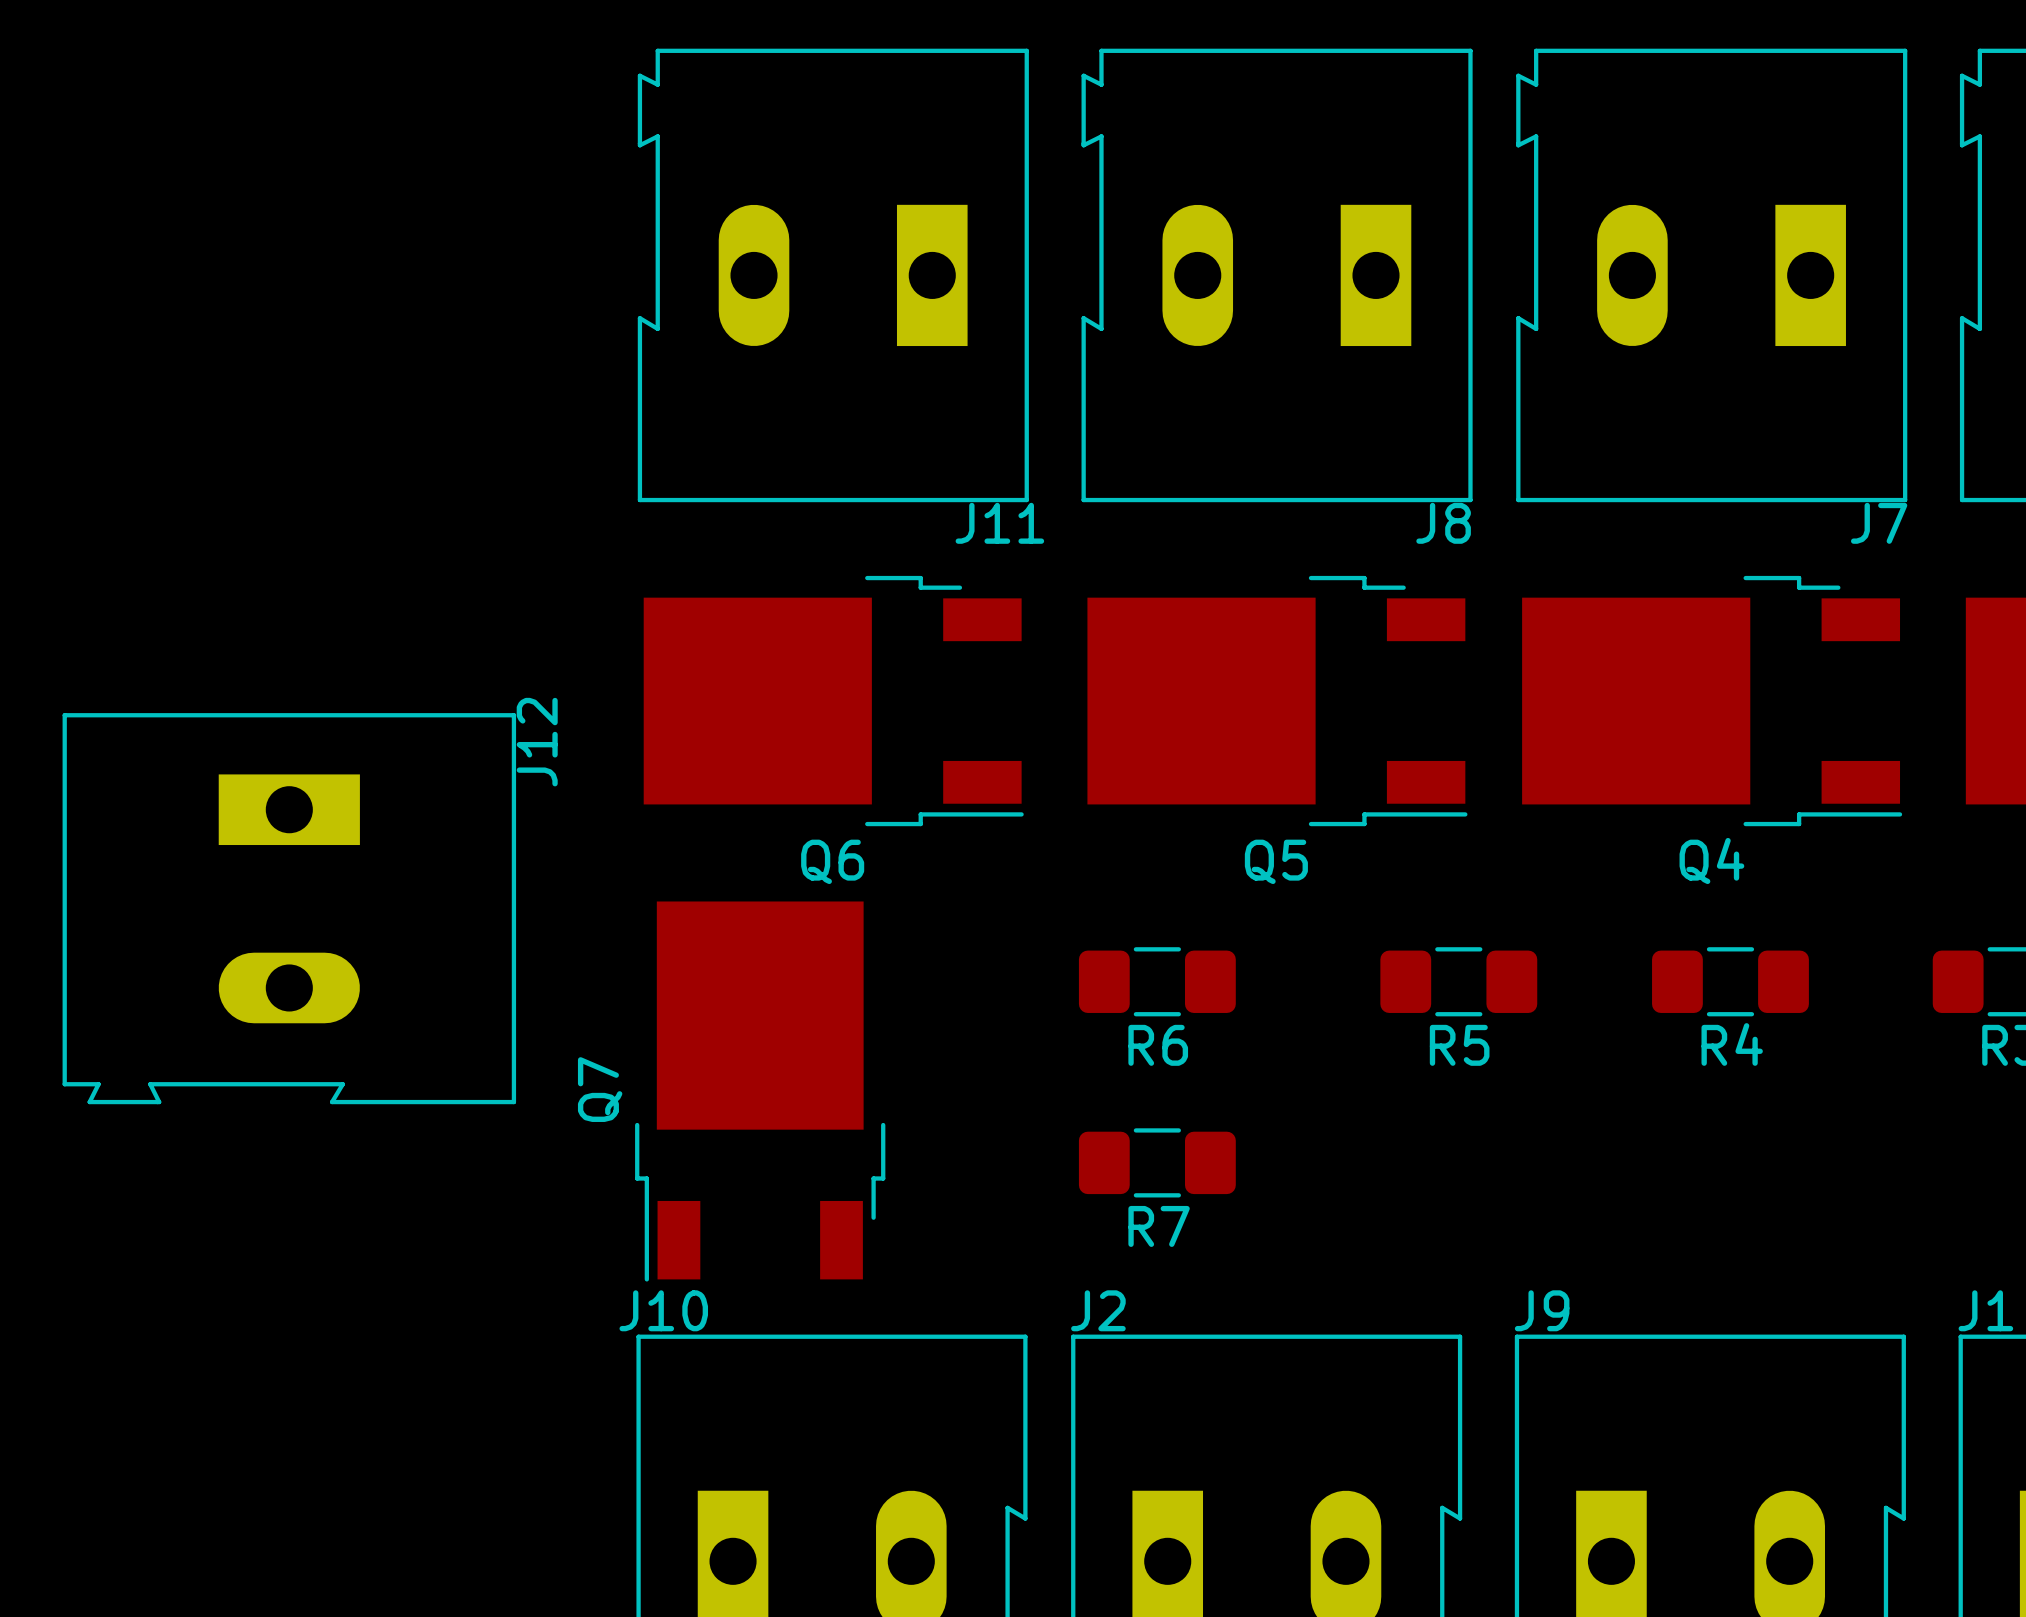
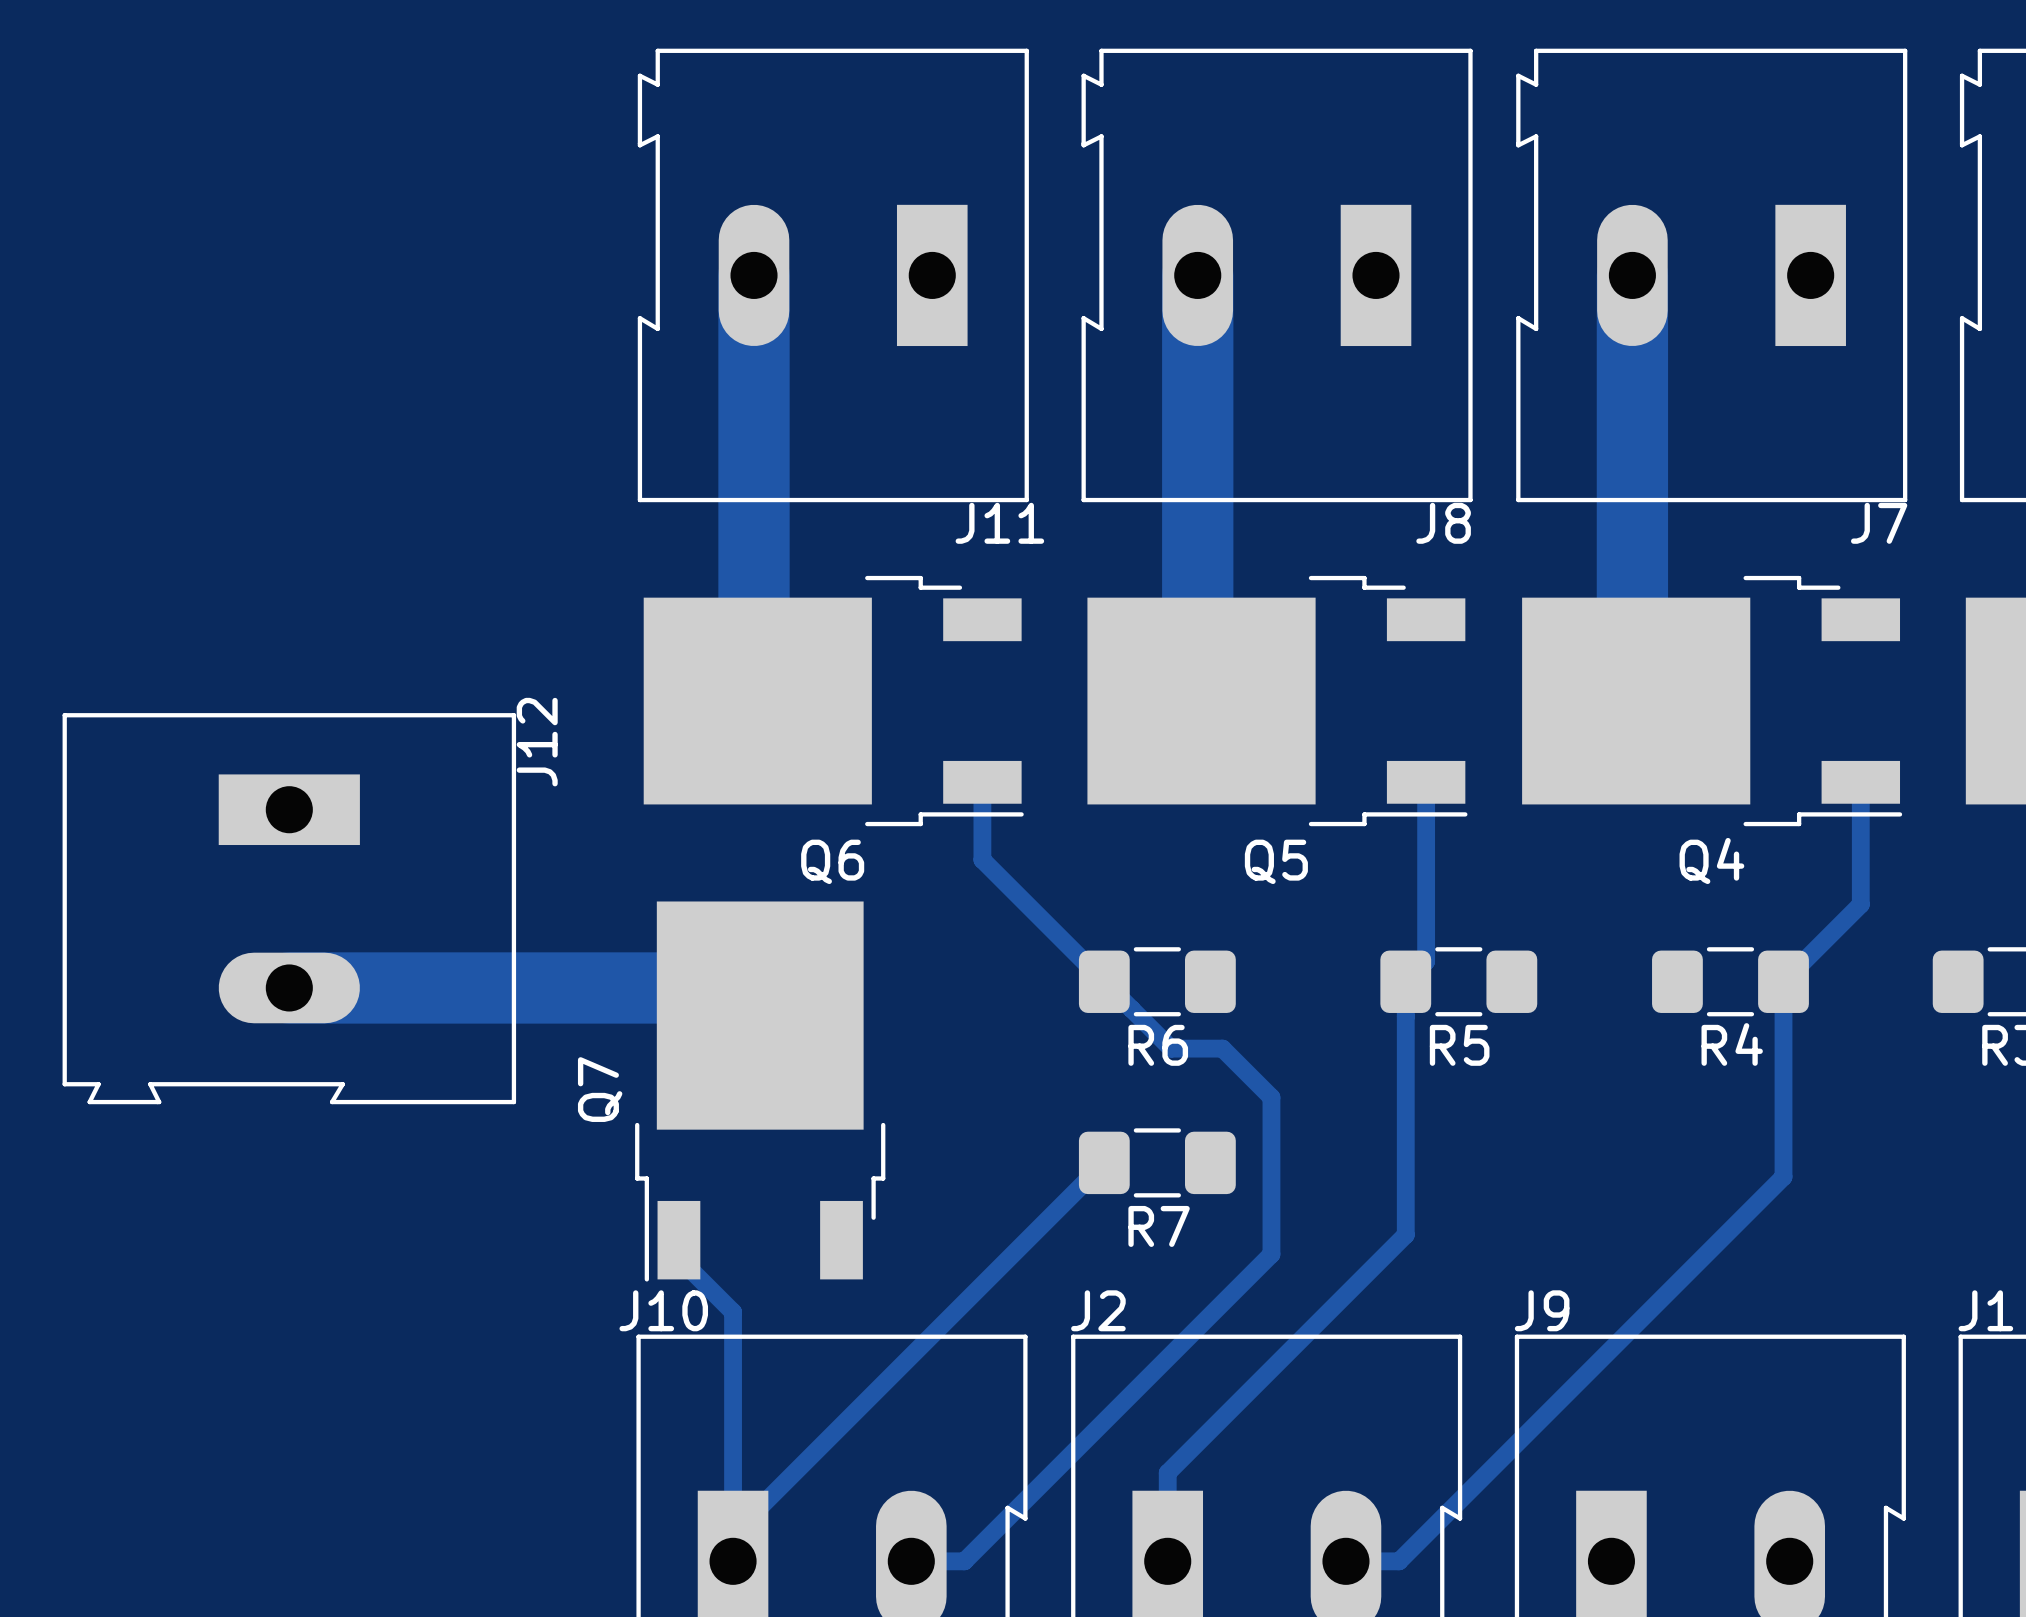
track: none -> (754, 275) (754, 697) (757, 701)
track: none -> (1197, 275) (1197, 697) (1201, 701)
track: none -> (1632, 275) (1632, 697) (1636, 701)
track: none -> (982, 782) (982, 859) (1171, 1048) (1222, 1048) (1271, 1097) (1271, 1254) (964, 1561) (911, 1561)
track: none -> (1426, 782) (1426, 961) (1405, 981) (1405, 1234) (1167, 1472) (1167, 1561)
track: none -> (1860, 782) (1860, 904) (1783, 981) (1783, 1176) (1399, 1561) (1345, 1561)
track: none -> (289, 987) (732, 987) (760, 1015)
track: none -> (1104, 1162) (733, 1534)
track: none -> (678, 1240) (678, 1258) (733, 1312) (733, 1561)

